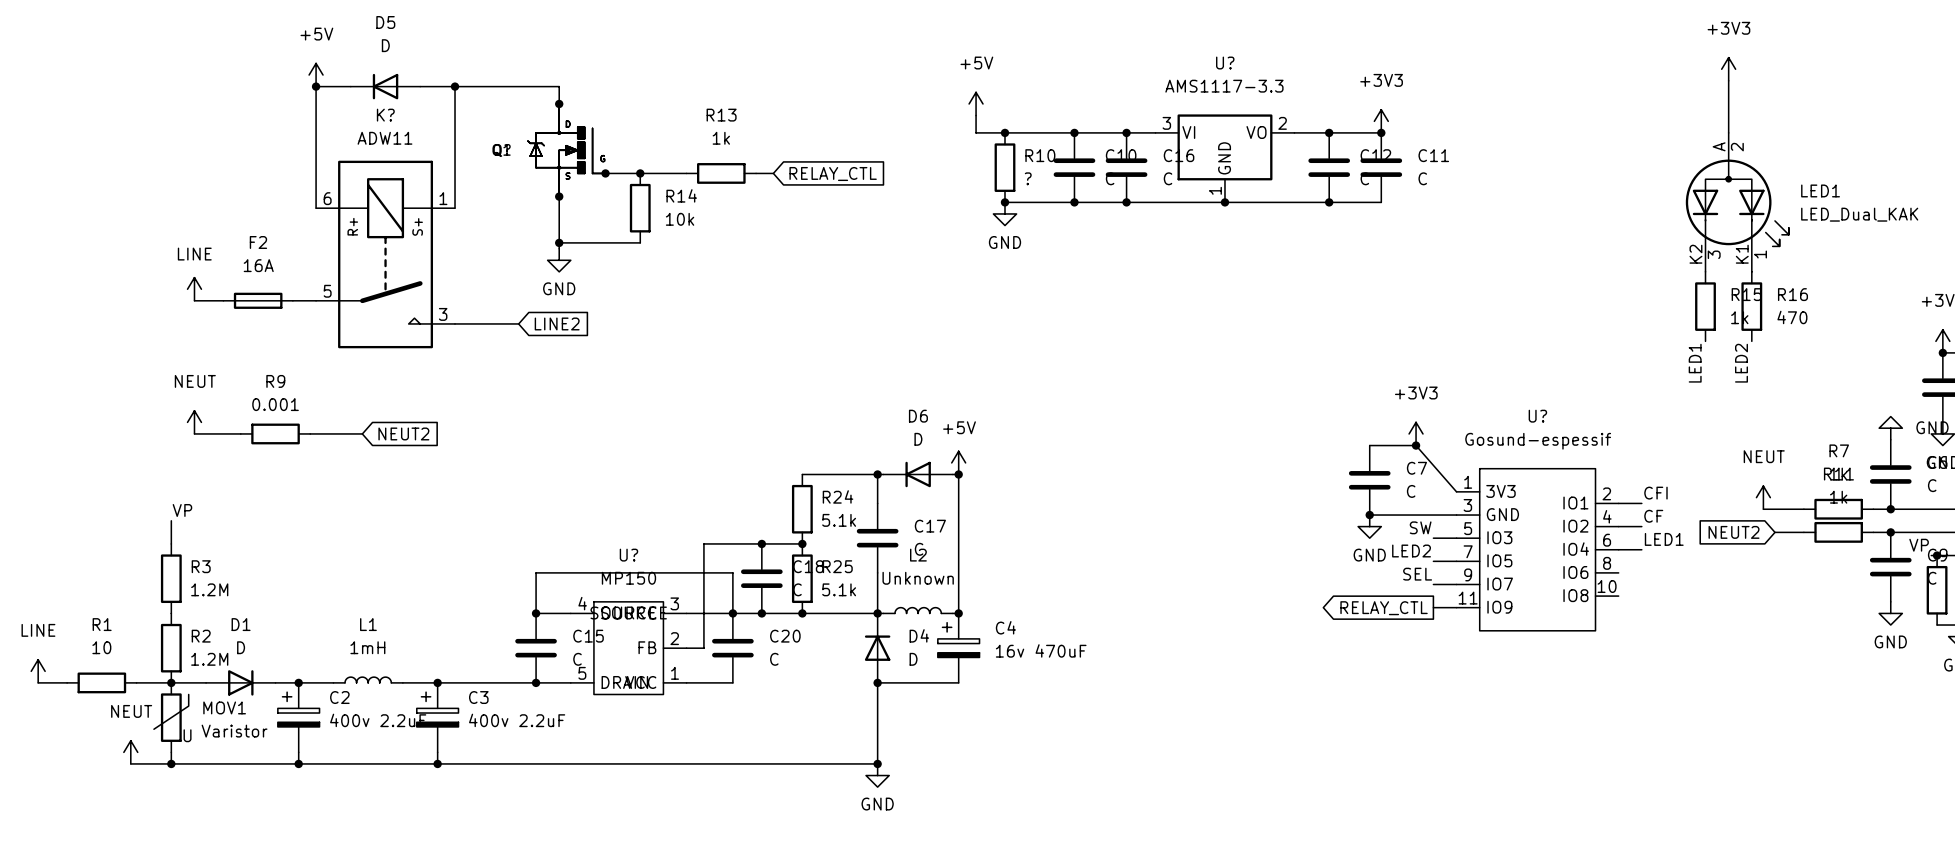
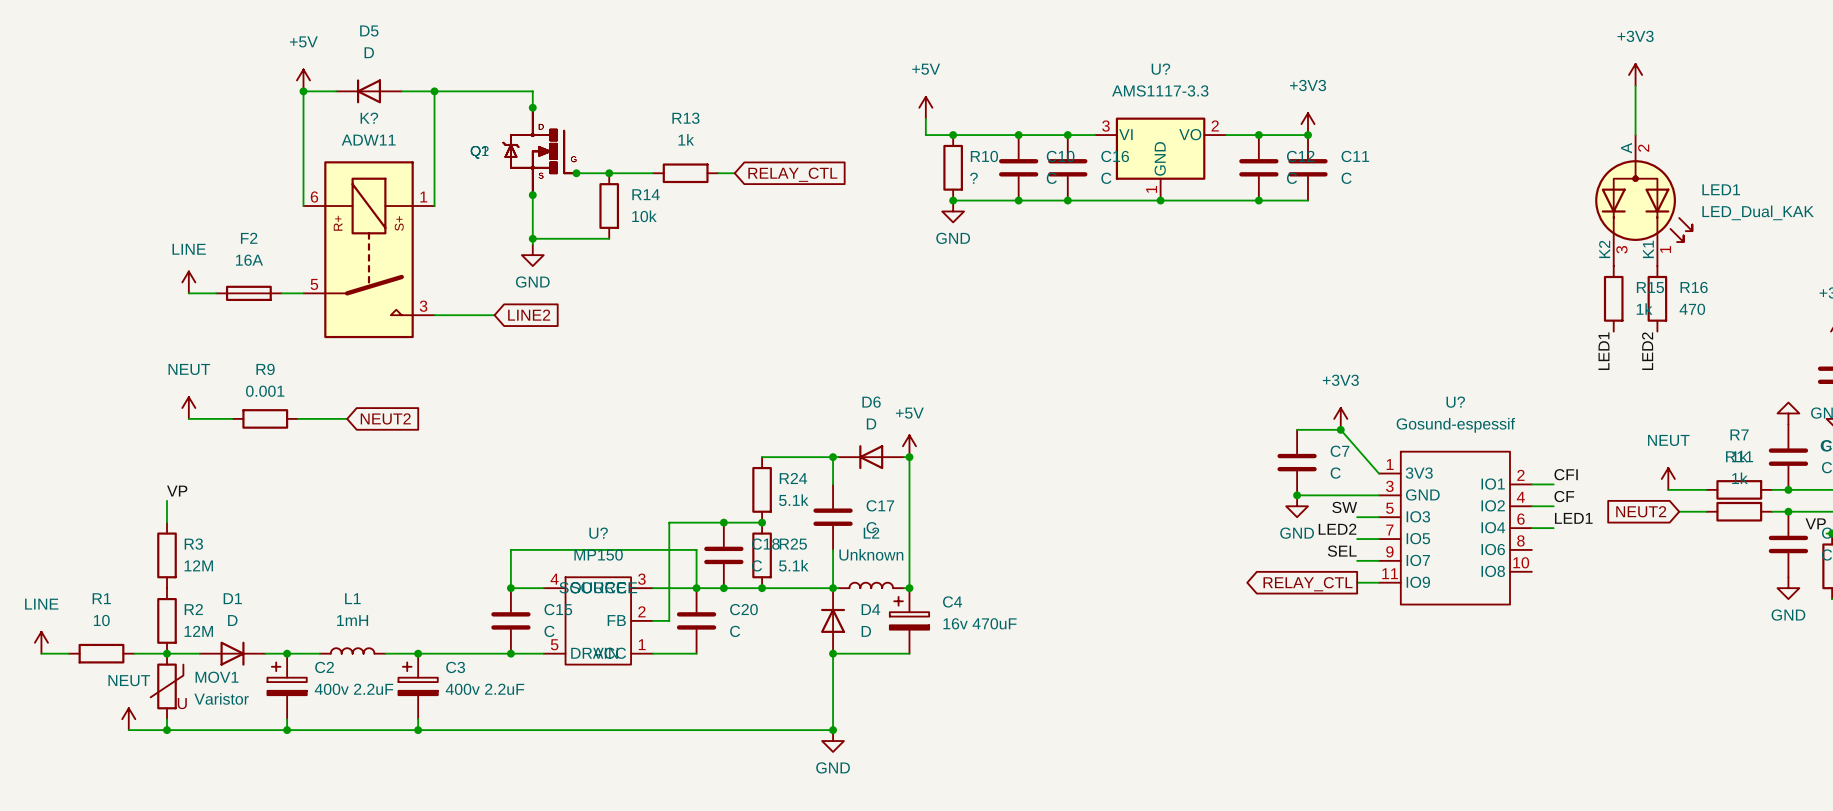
R3 value: 1.2M (209, 589) -> 12M (198, 565)
R2 value: 1.2M (209, 659) -> 12M (198, 631)

